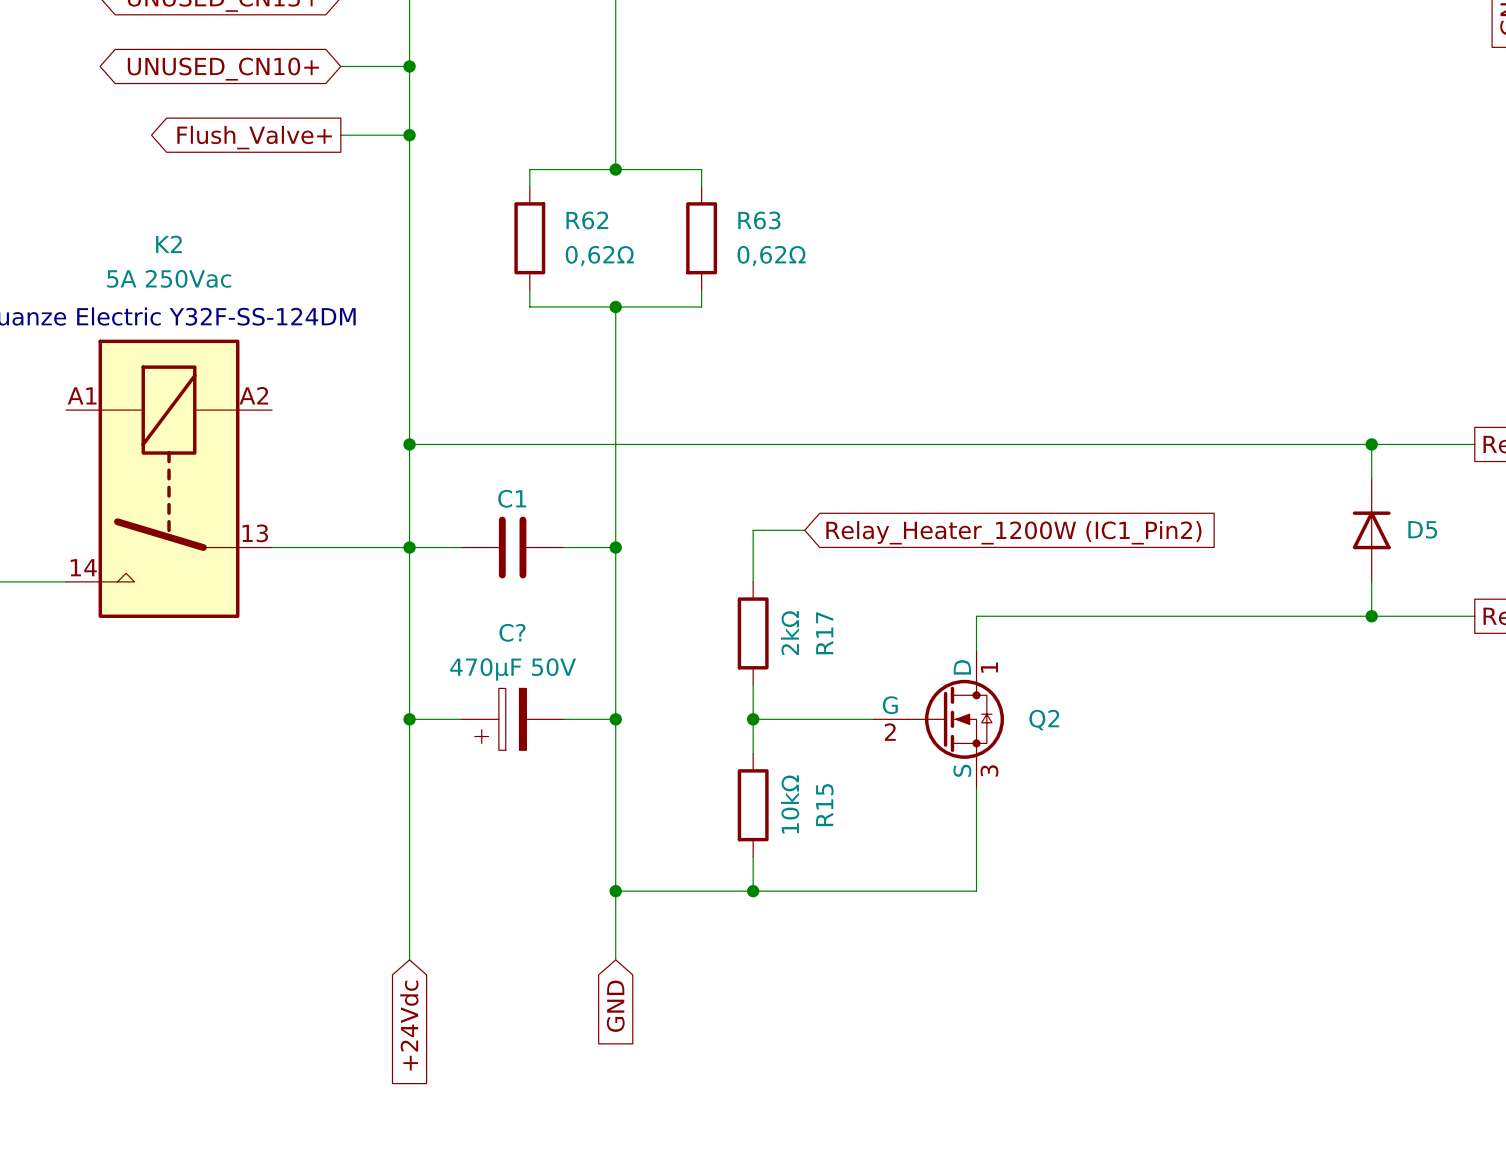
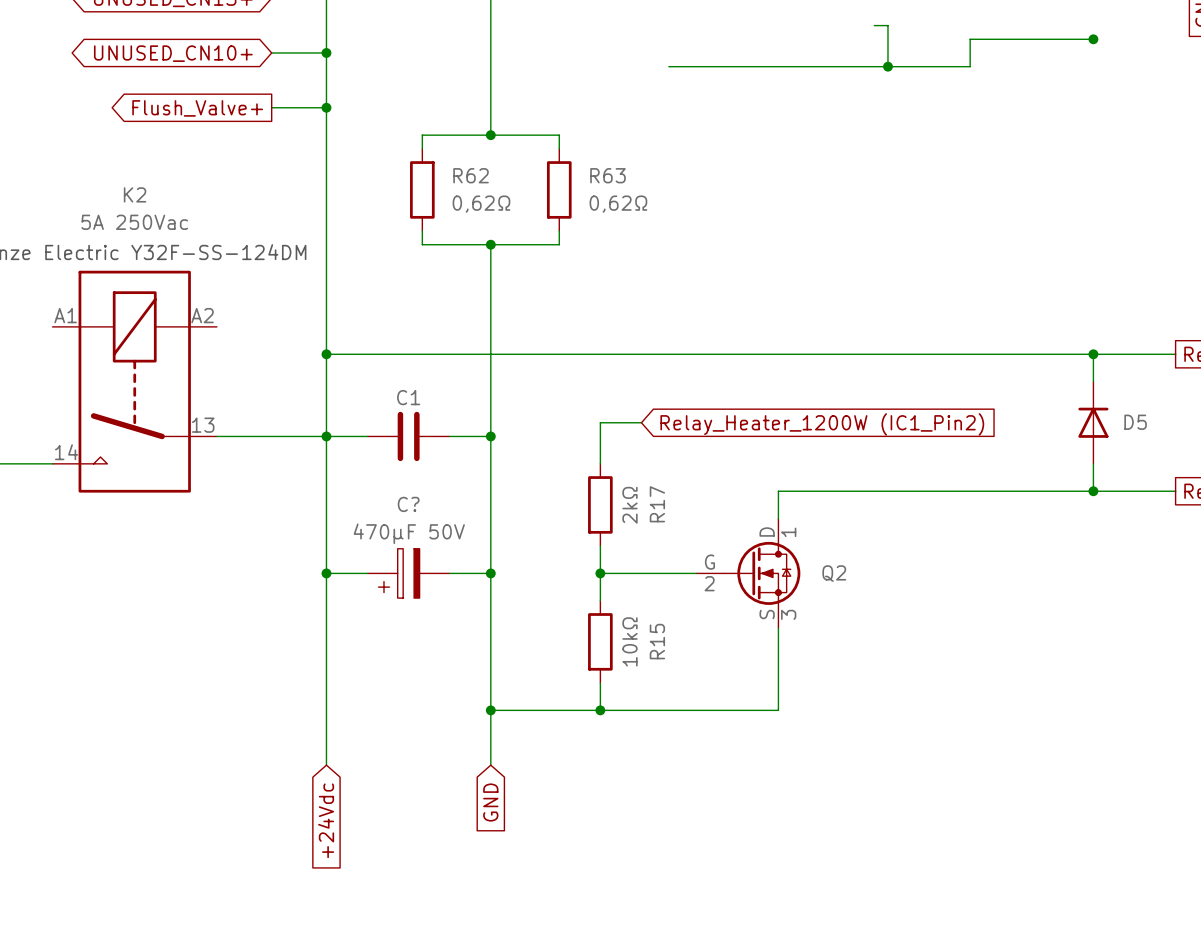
wire: none -> (874, 25) (887, 25) (887, 66)
wire: none -> (1093, 39) (970, 39) (970, 66) (668, 66)
junction: none -> (1093, 39)
junction: none -> (887, 66)

